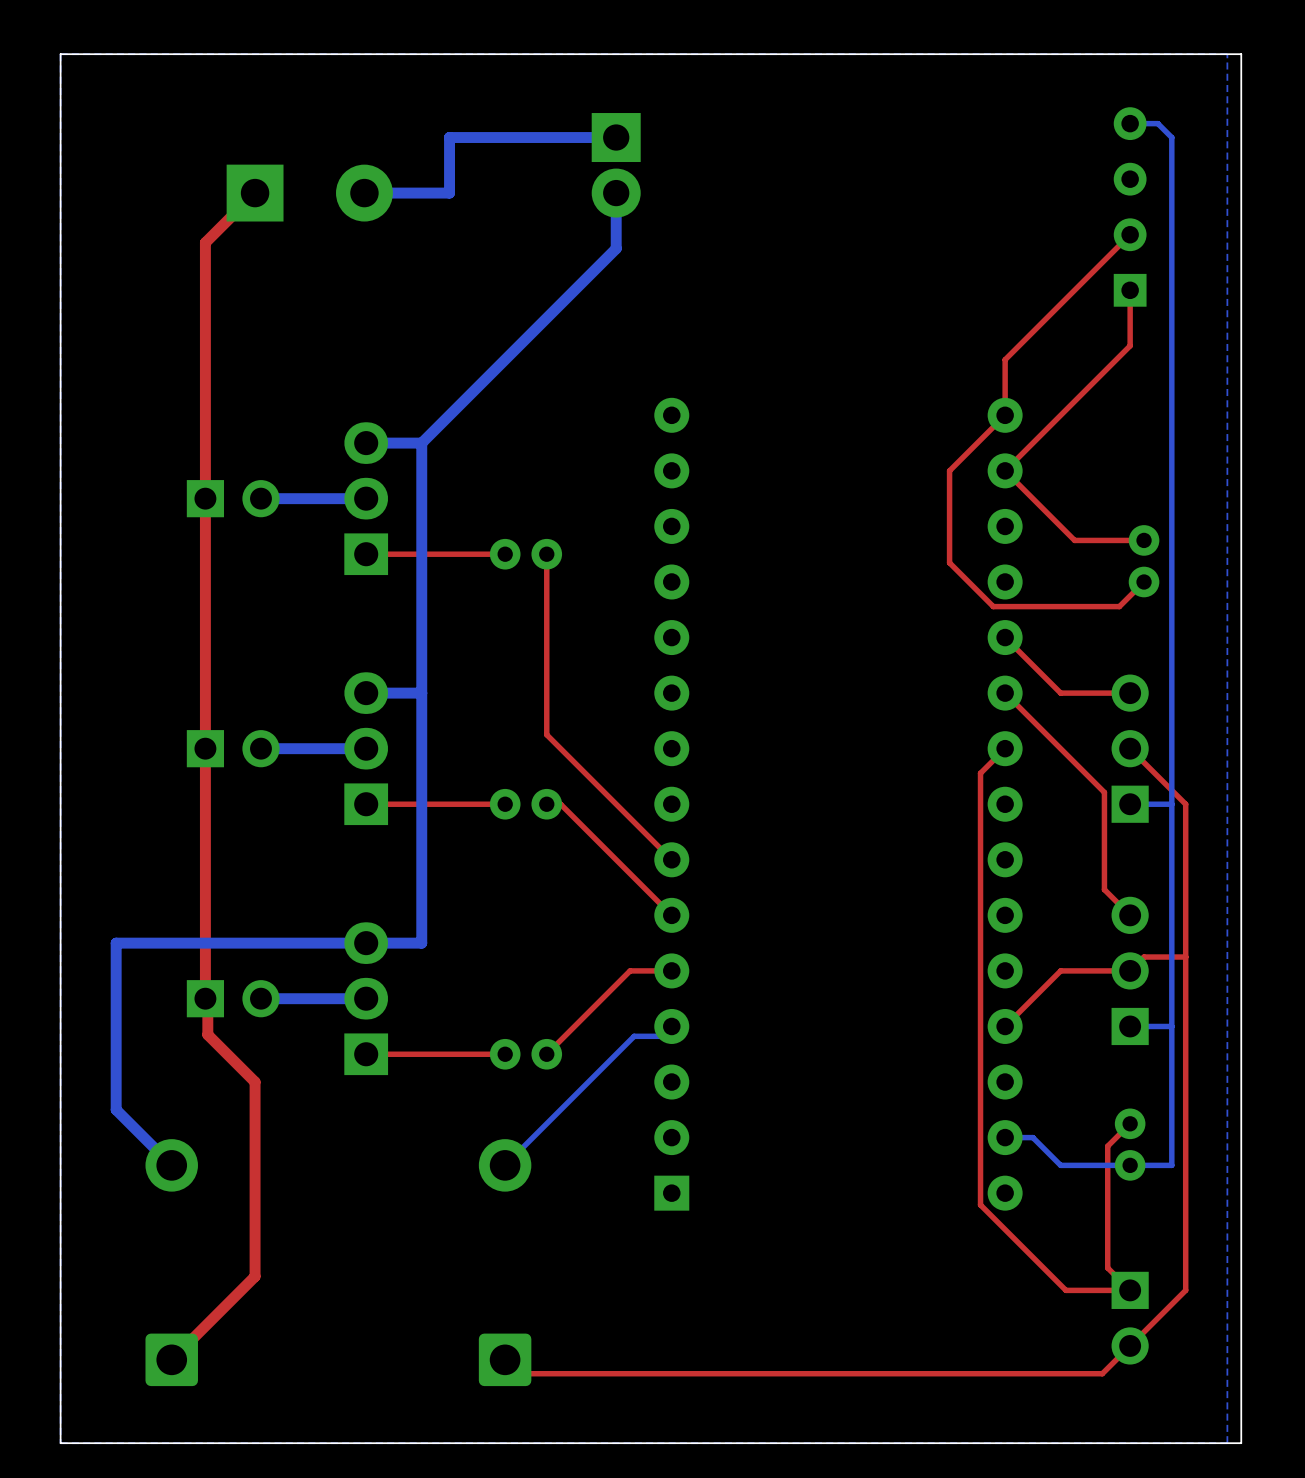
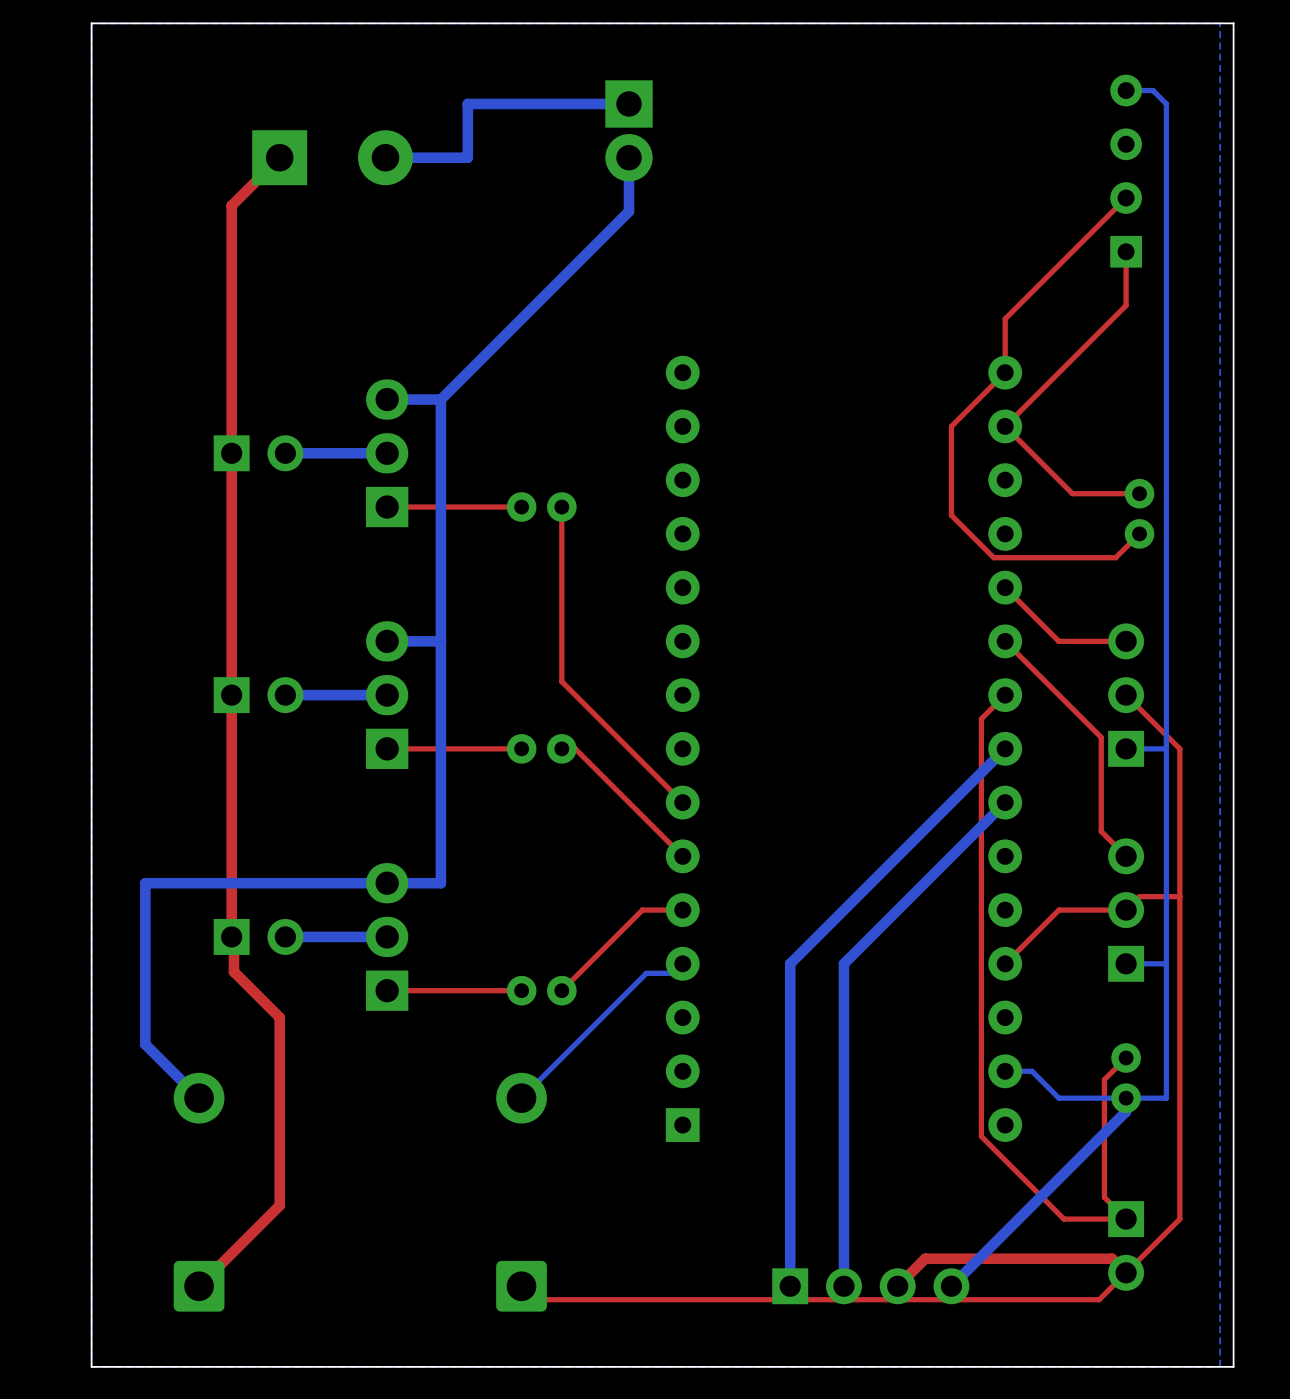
bottom track: none -> (1005, 748) (790, 963) (790, 1286)
bottom track: none -> (1005, 802) (843, 963) (843, 1286)
bottom track: none -> (1126, 1098) (1126, 1111) (951, 1286)
top track: none -> (1126, 1272) (1112, 1258) (925, 1258) (897, 1286)
part: none -> (870, 1286)

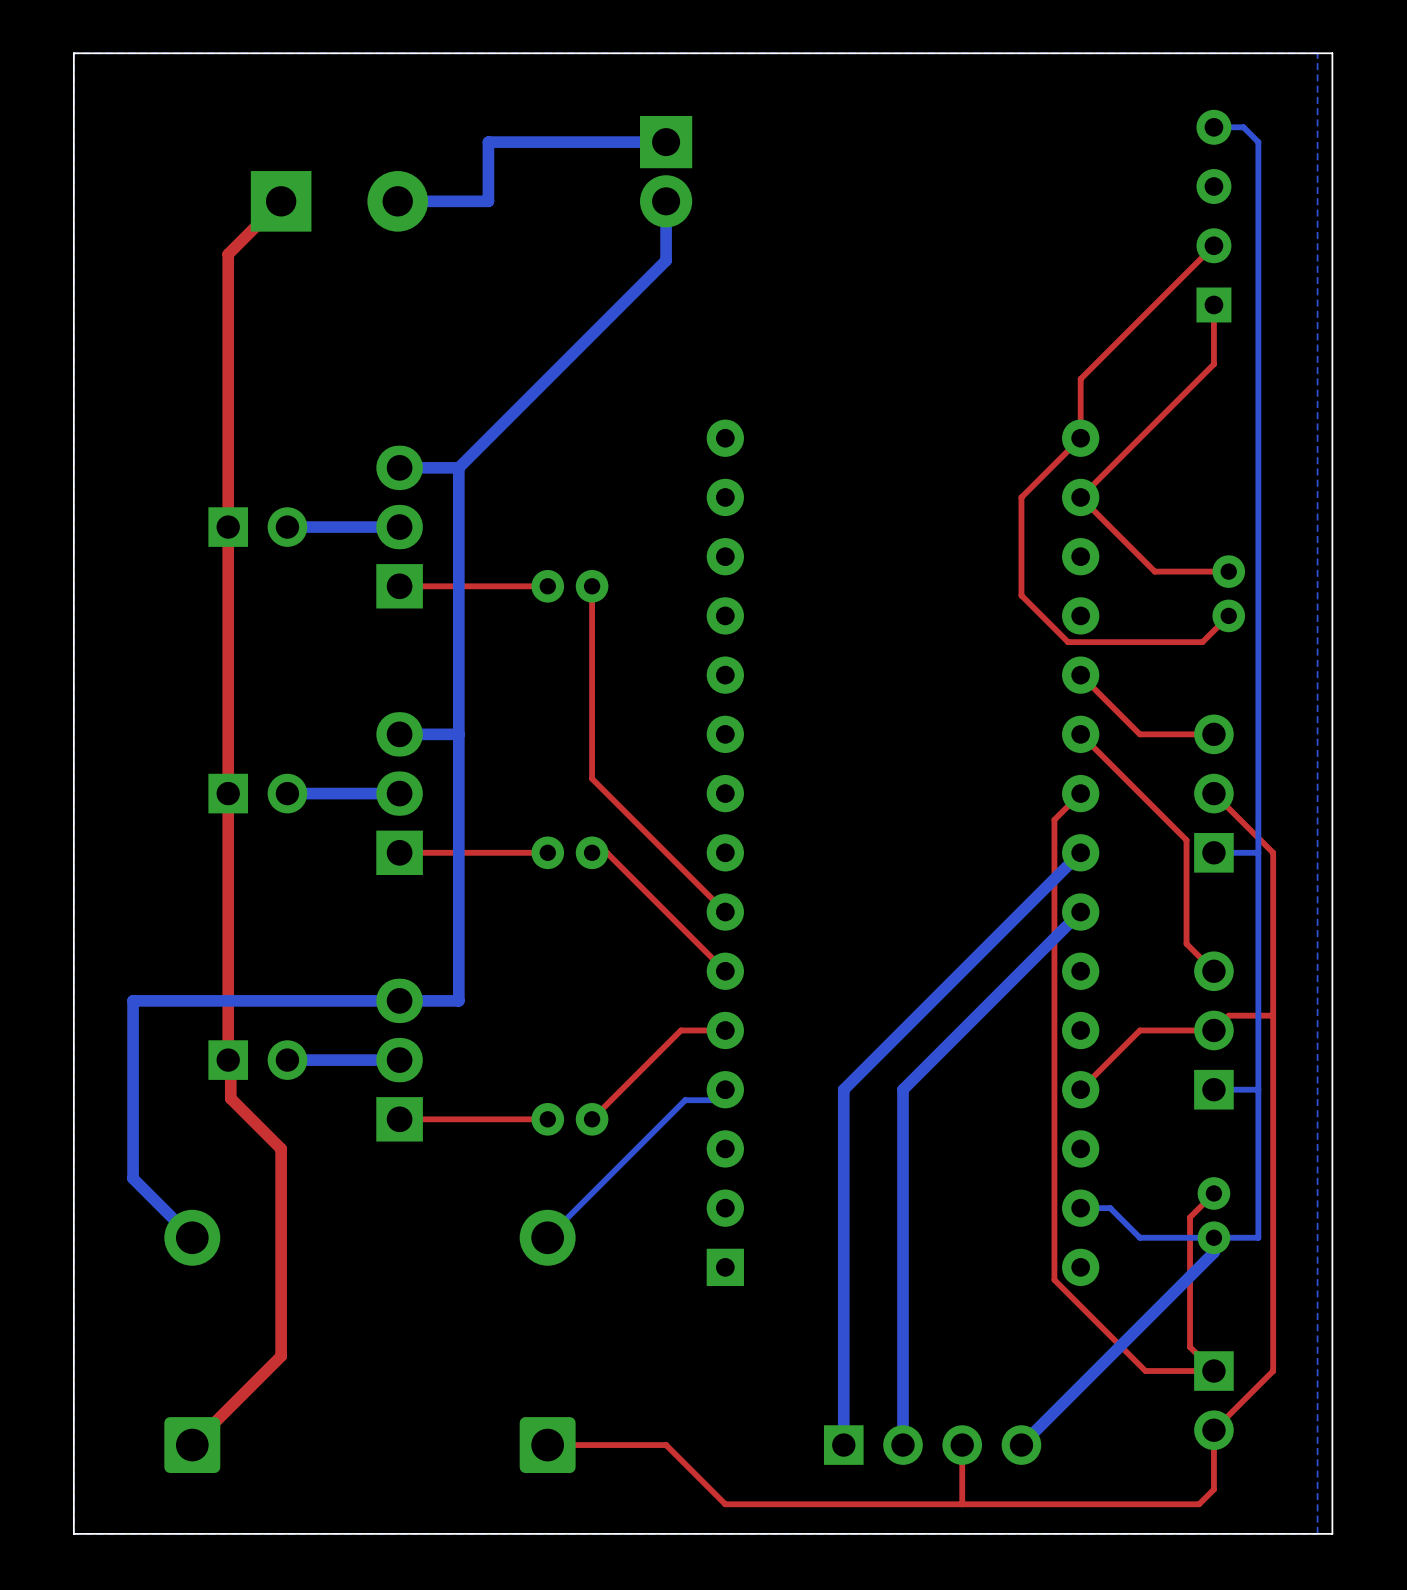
top track: none -> (1213, 1430) (1213, 1489) (1199, 1504) (725, 1504) (666, 1445) (547, 1445)
top track: (897, 1286) (925, 1258) (1112, 1258) (1126, 1272) (1099, 1299) (534, 1299) -> (962, 1445) (962, 1504)

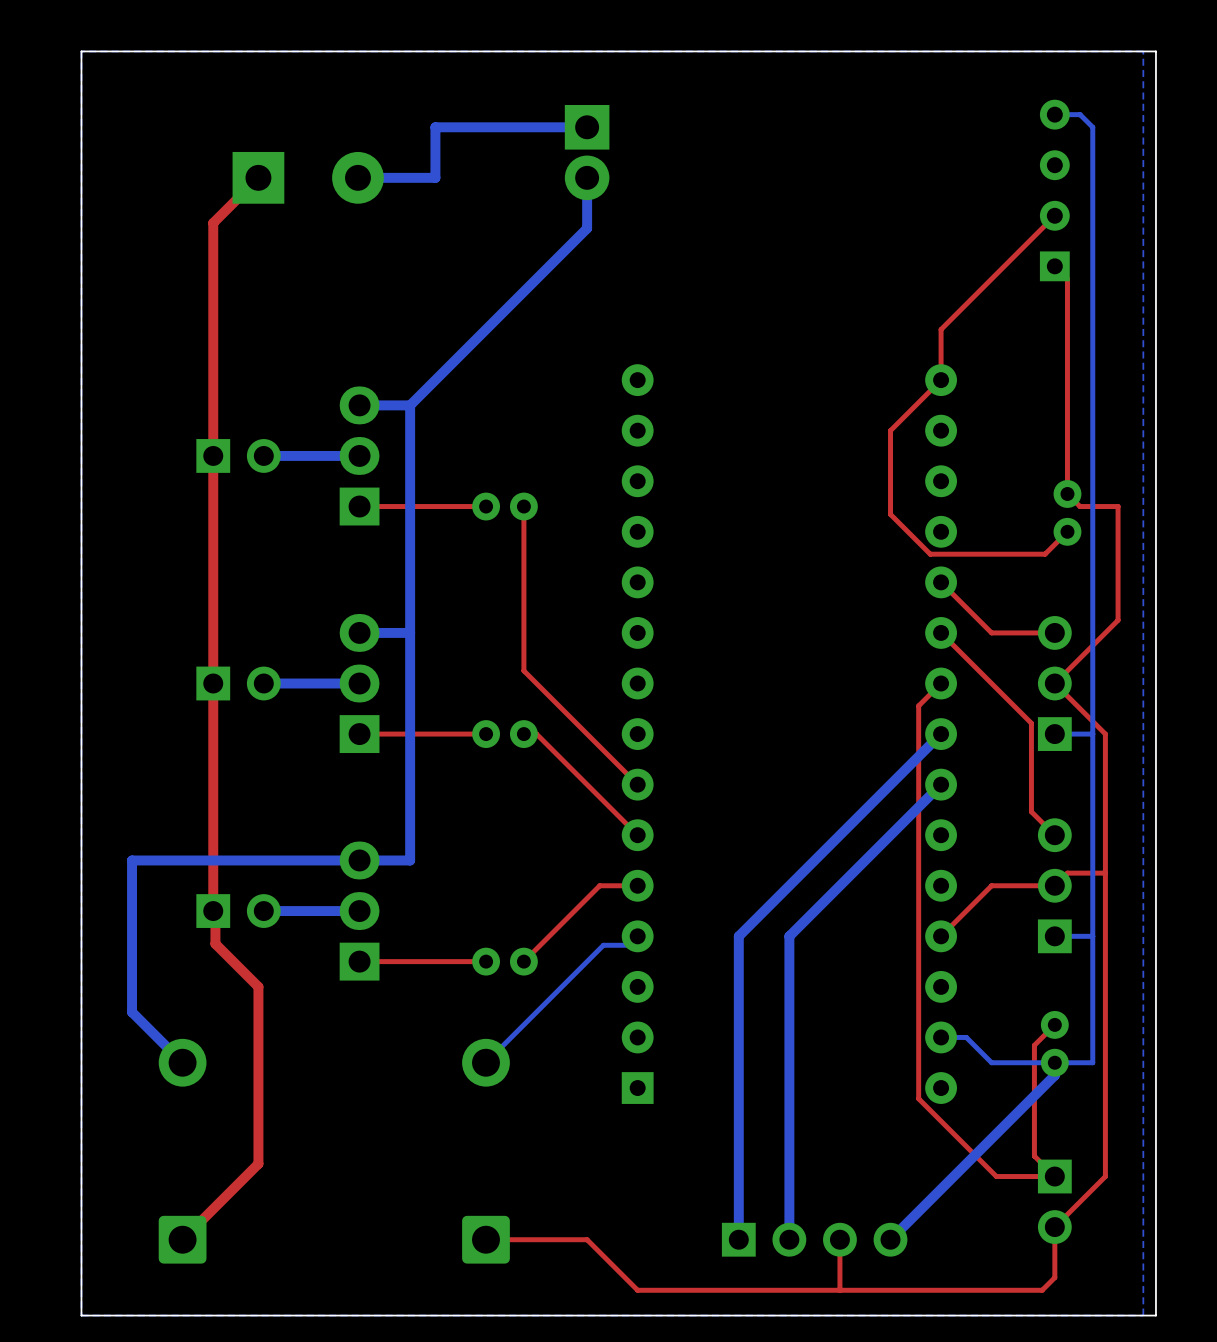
top track: (1213, 304) (1213, 364) (1080, 497) (1154, 571) (1228, 571) -> (1054, 266) (1067, 278) (1067, 501)
top track: none -> (1067, 493) (1080, 506) (1118, 506) (1118, 620) (1054, 683)

